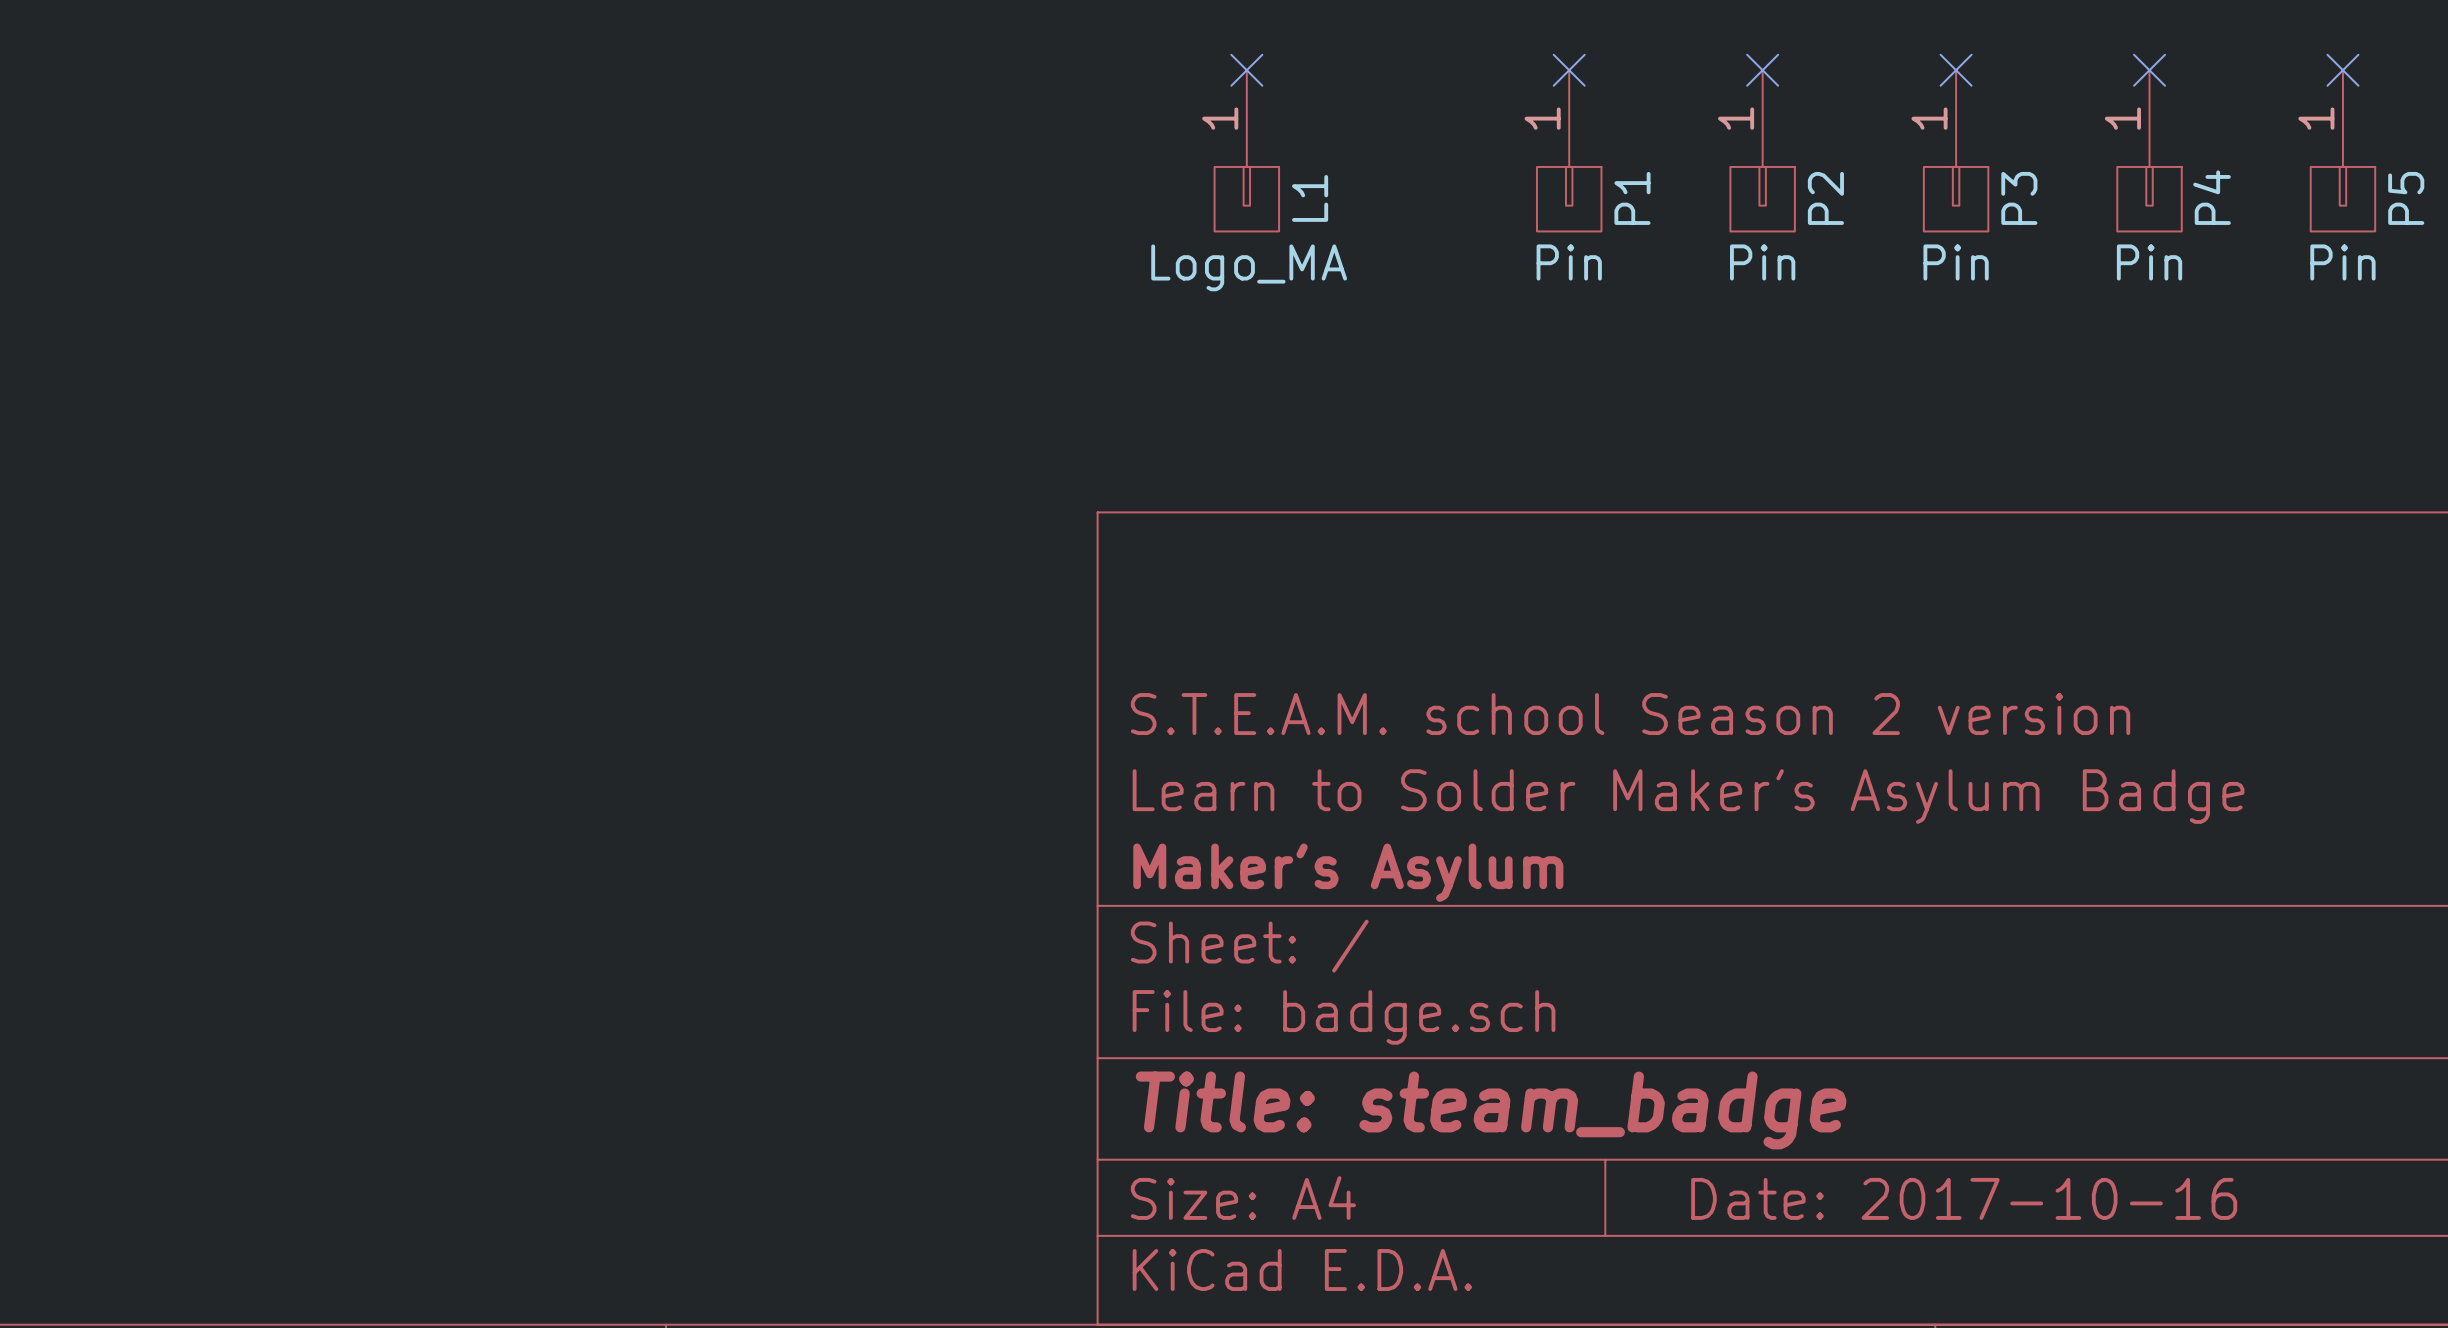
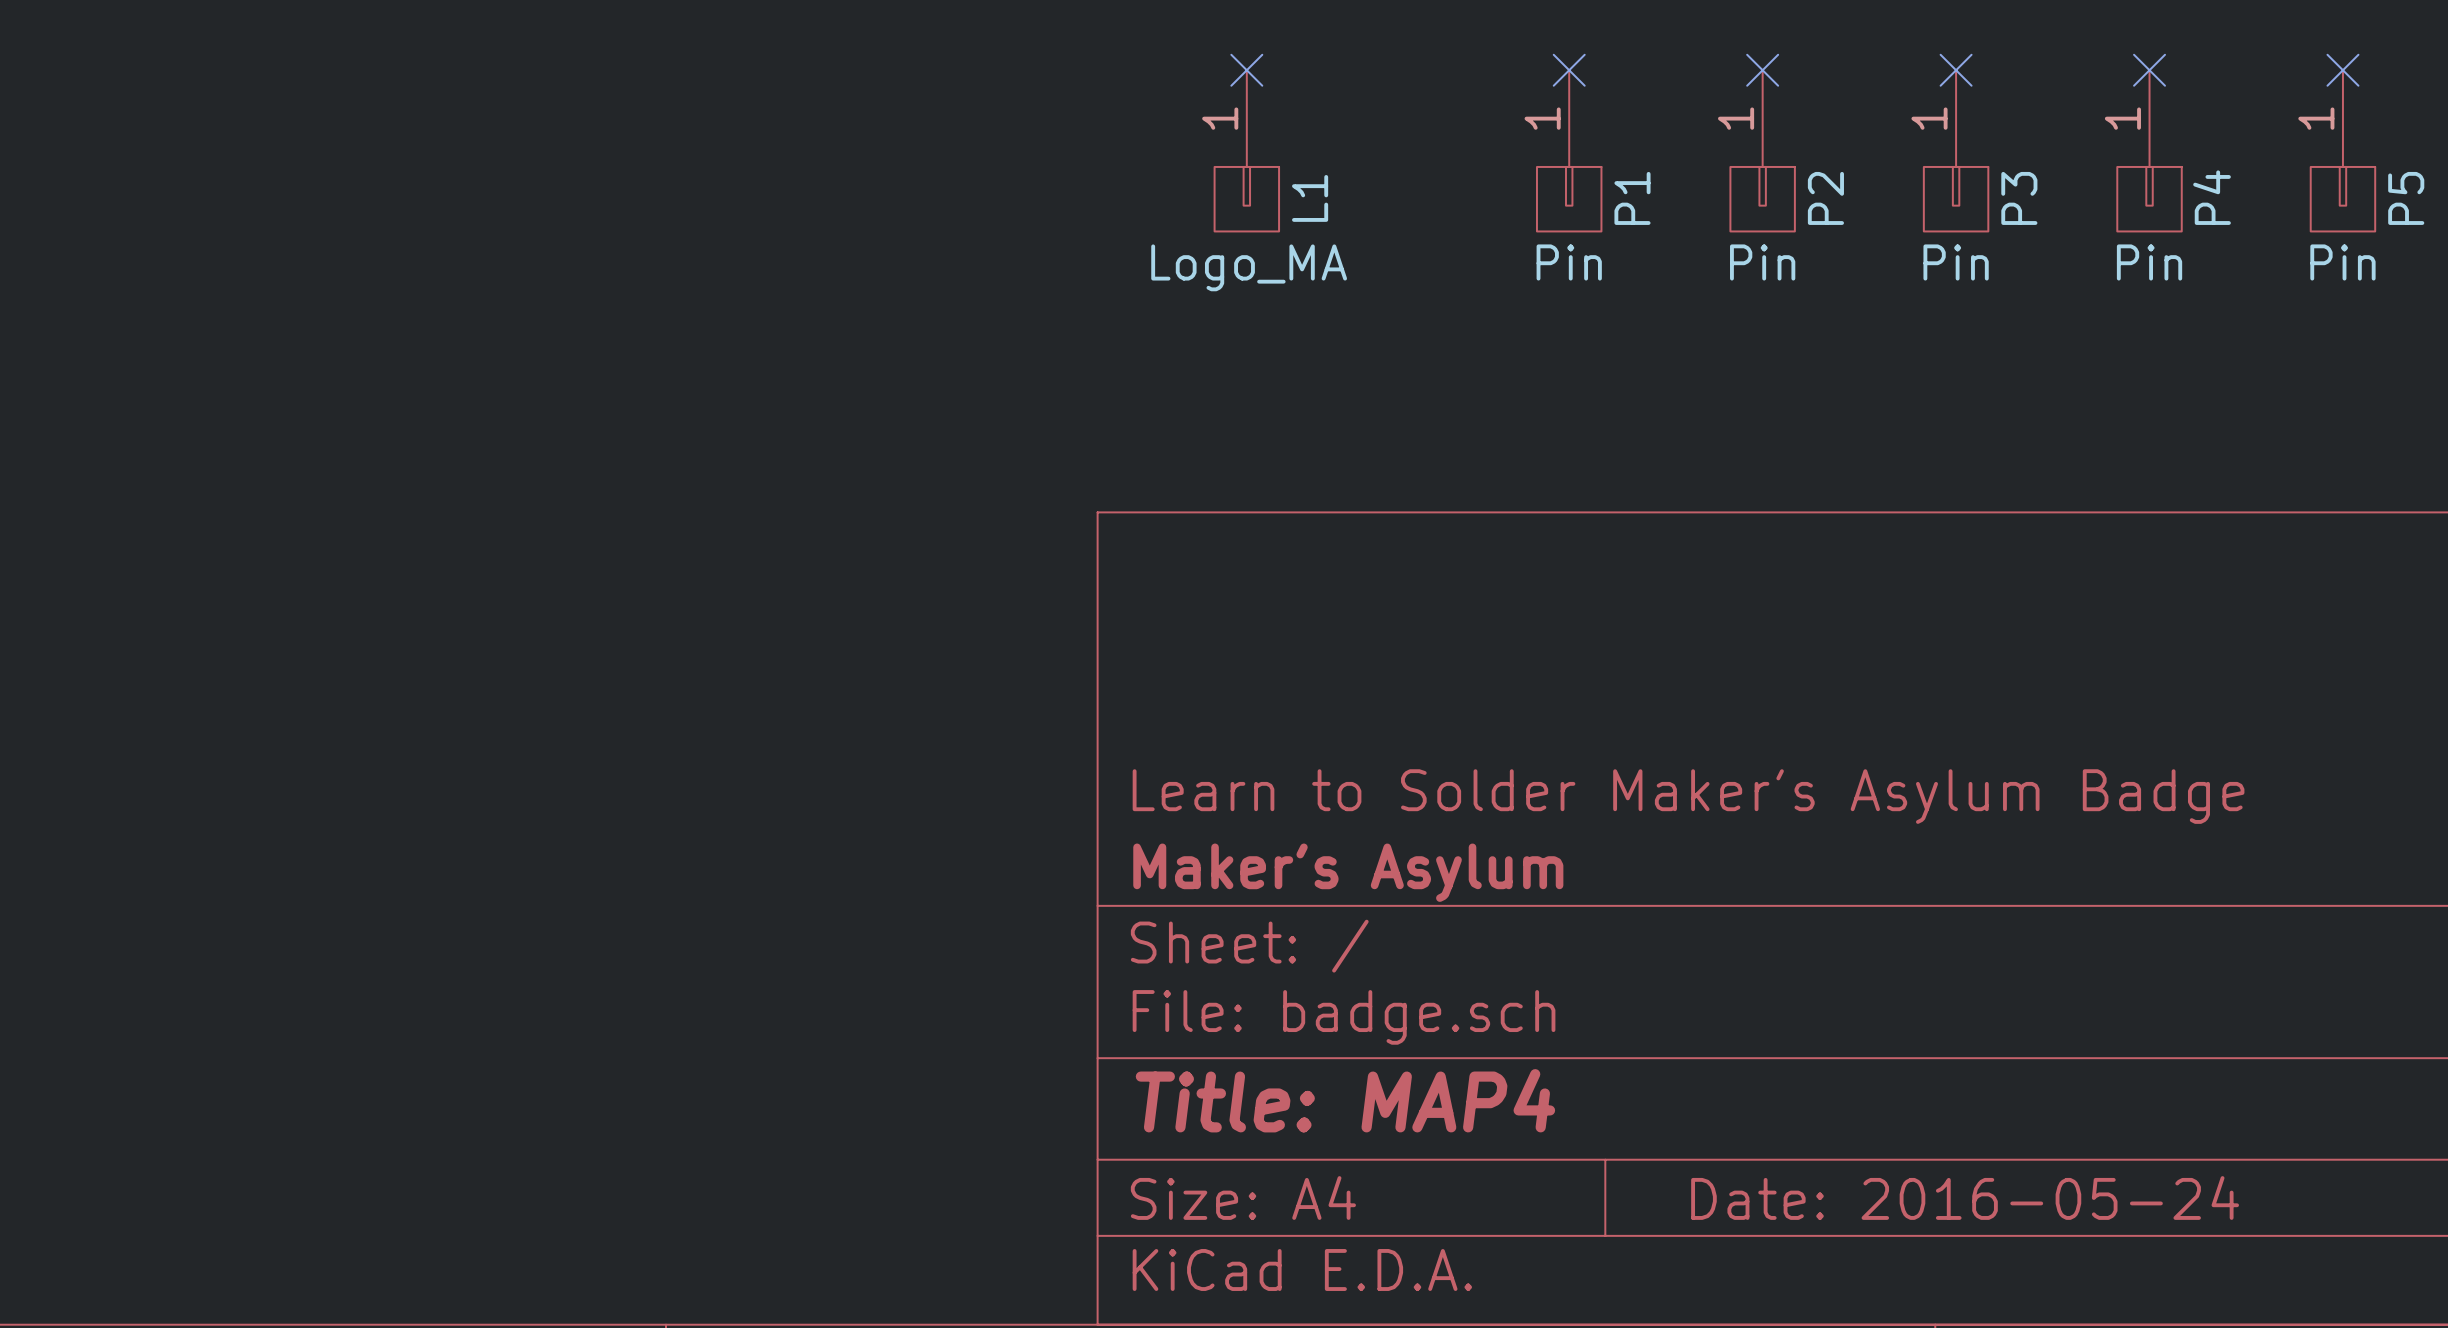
title block: S.T.E.A.M. school Season 2 version (1630, 714) -> none
title block: Title: steam_badge (1491, 1110) -> Title: MAP4 (1345, 1100)
title block: Date: 2017-10-16 (1964, 1198) -> Date: 2016-05-24 (1965, 1198)

